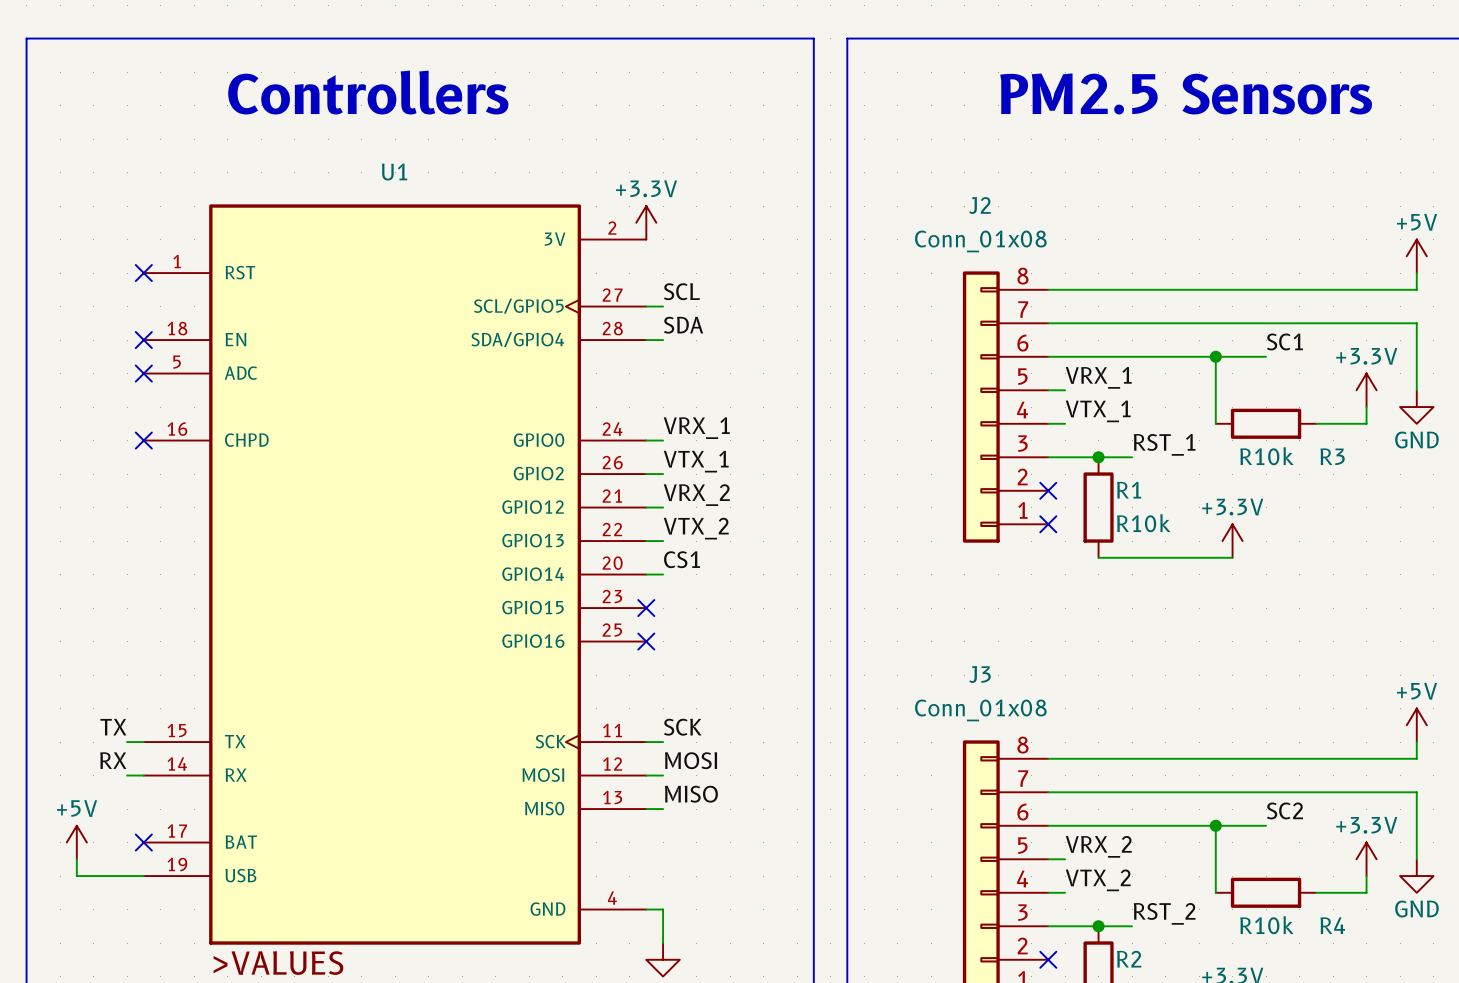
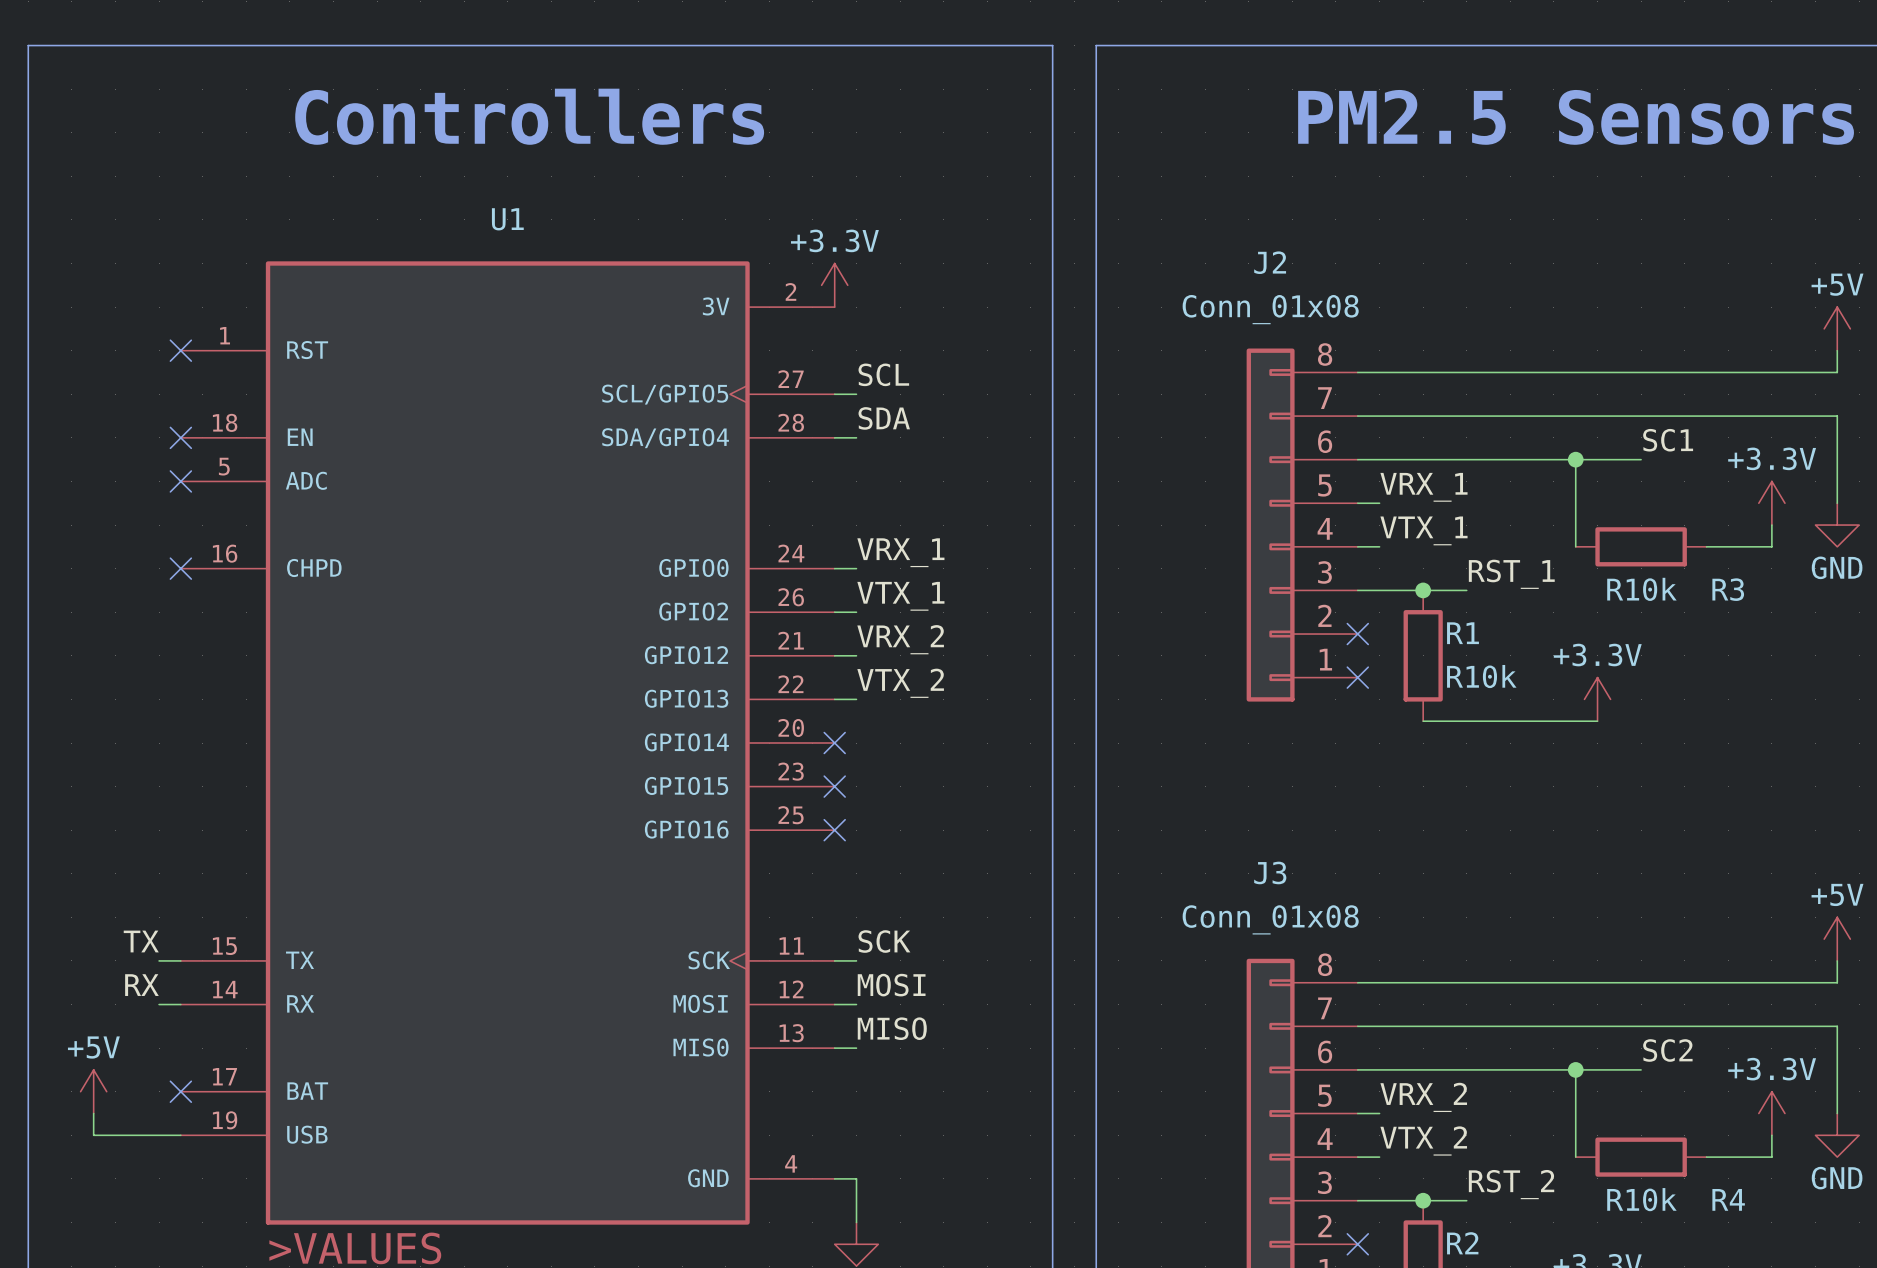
label: CS1 (682, 559) -> none
wire: (646, 574) (663, 574) -> none
no-connect mark: none -> (834, 743)

